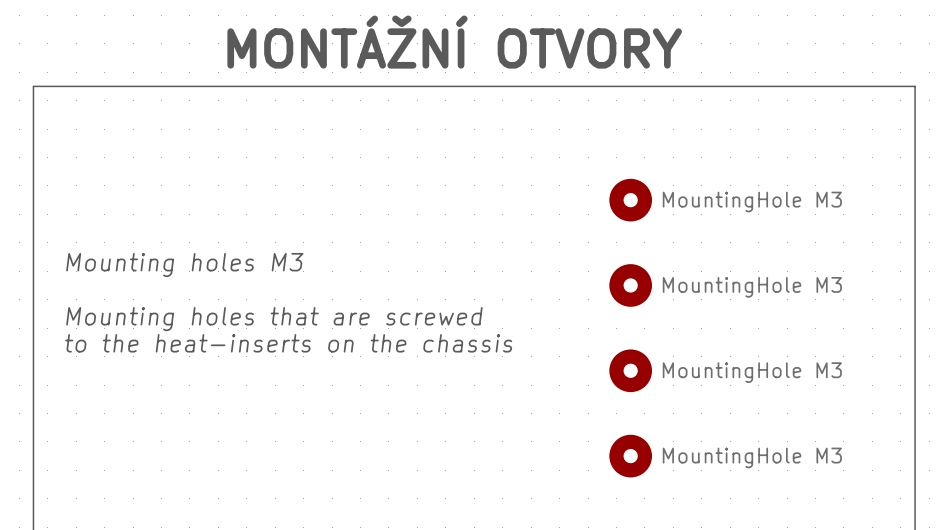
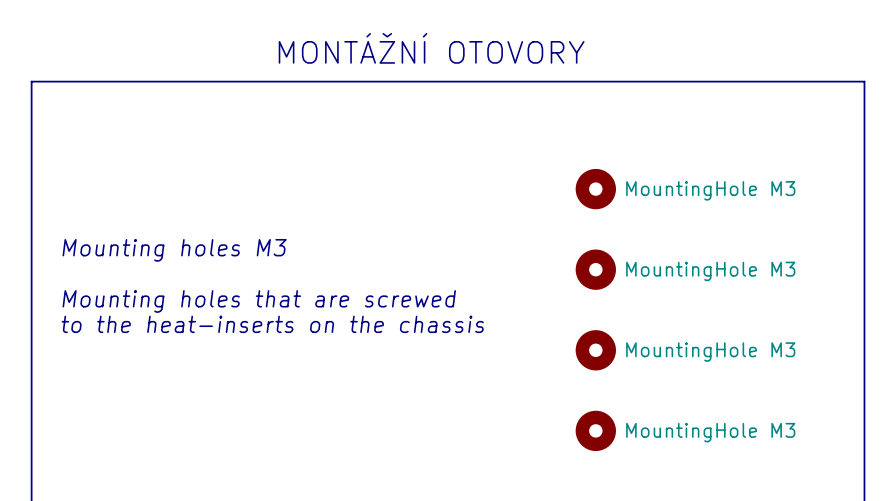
text: MONTÁŽNÍ OTVORY (454, 42) -> MONTÁŽNÍ OTOVORY (431, 48)

